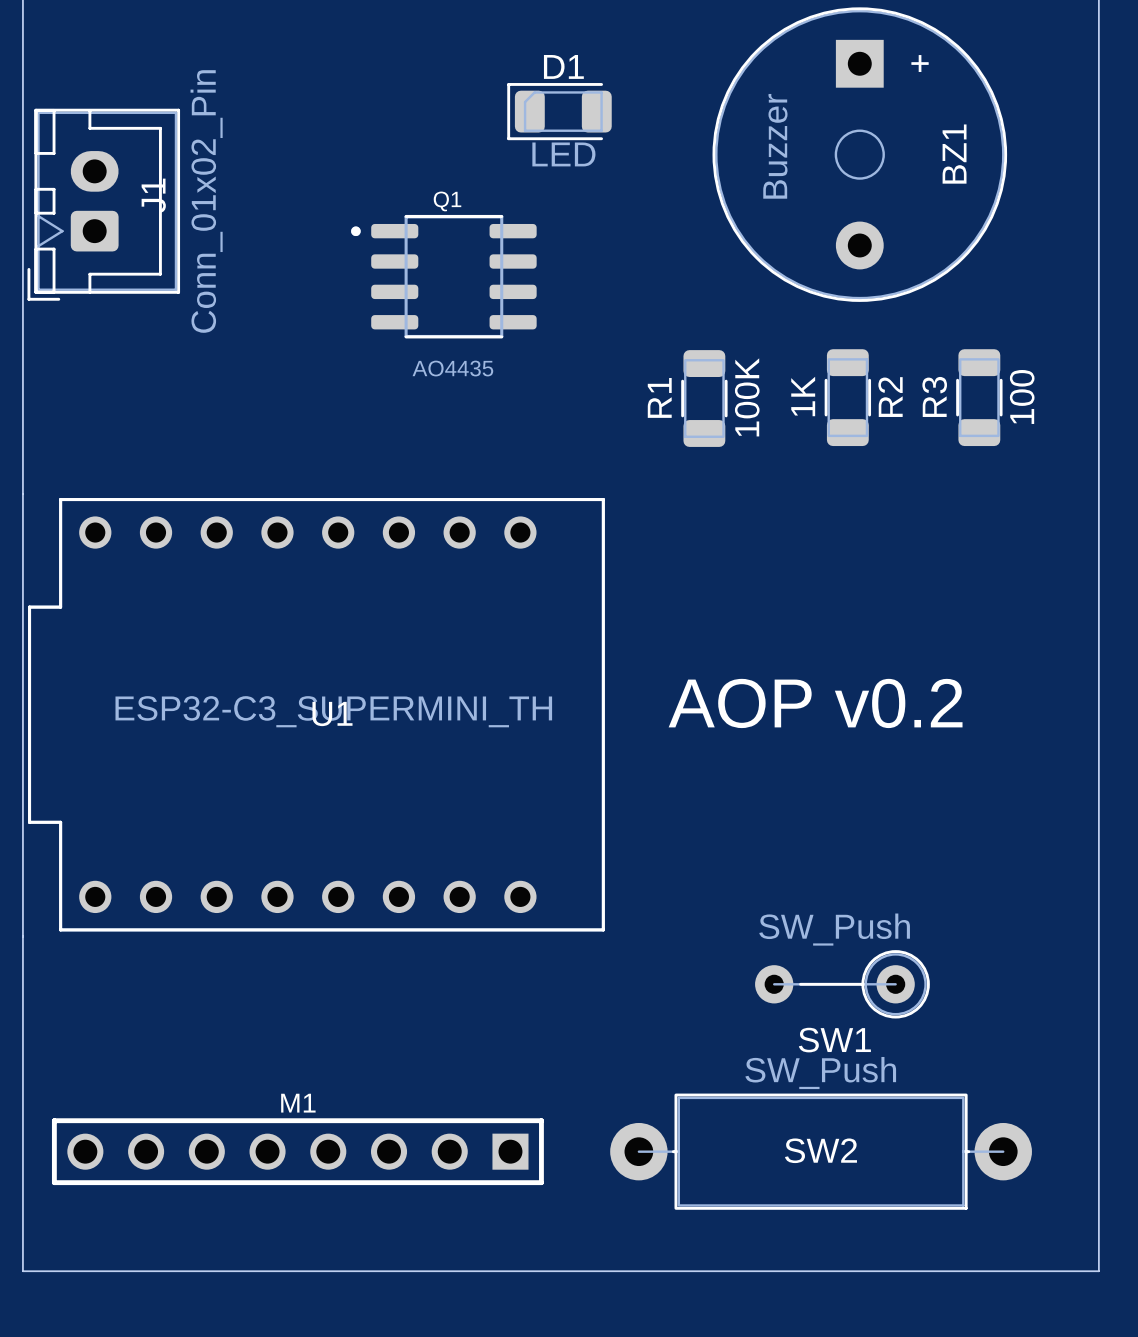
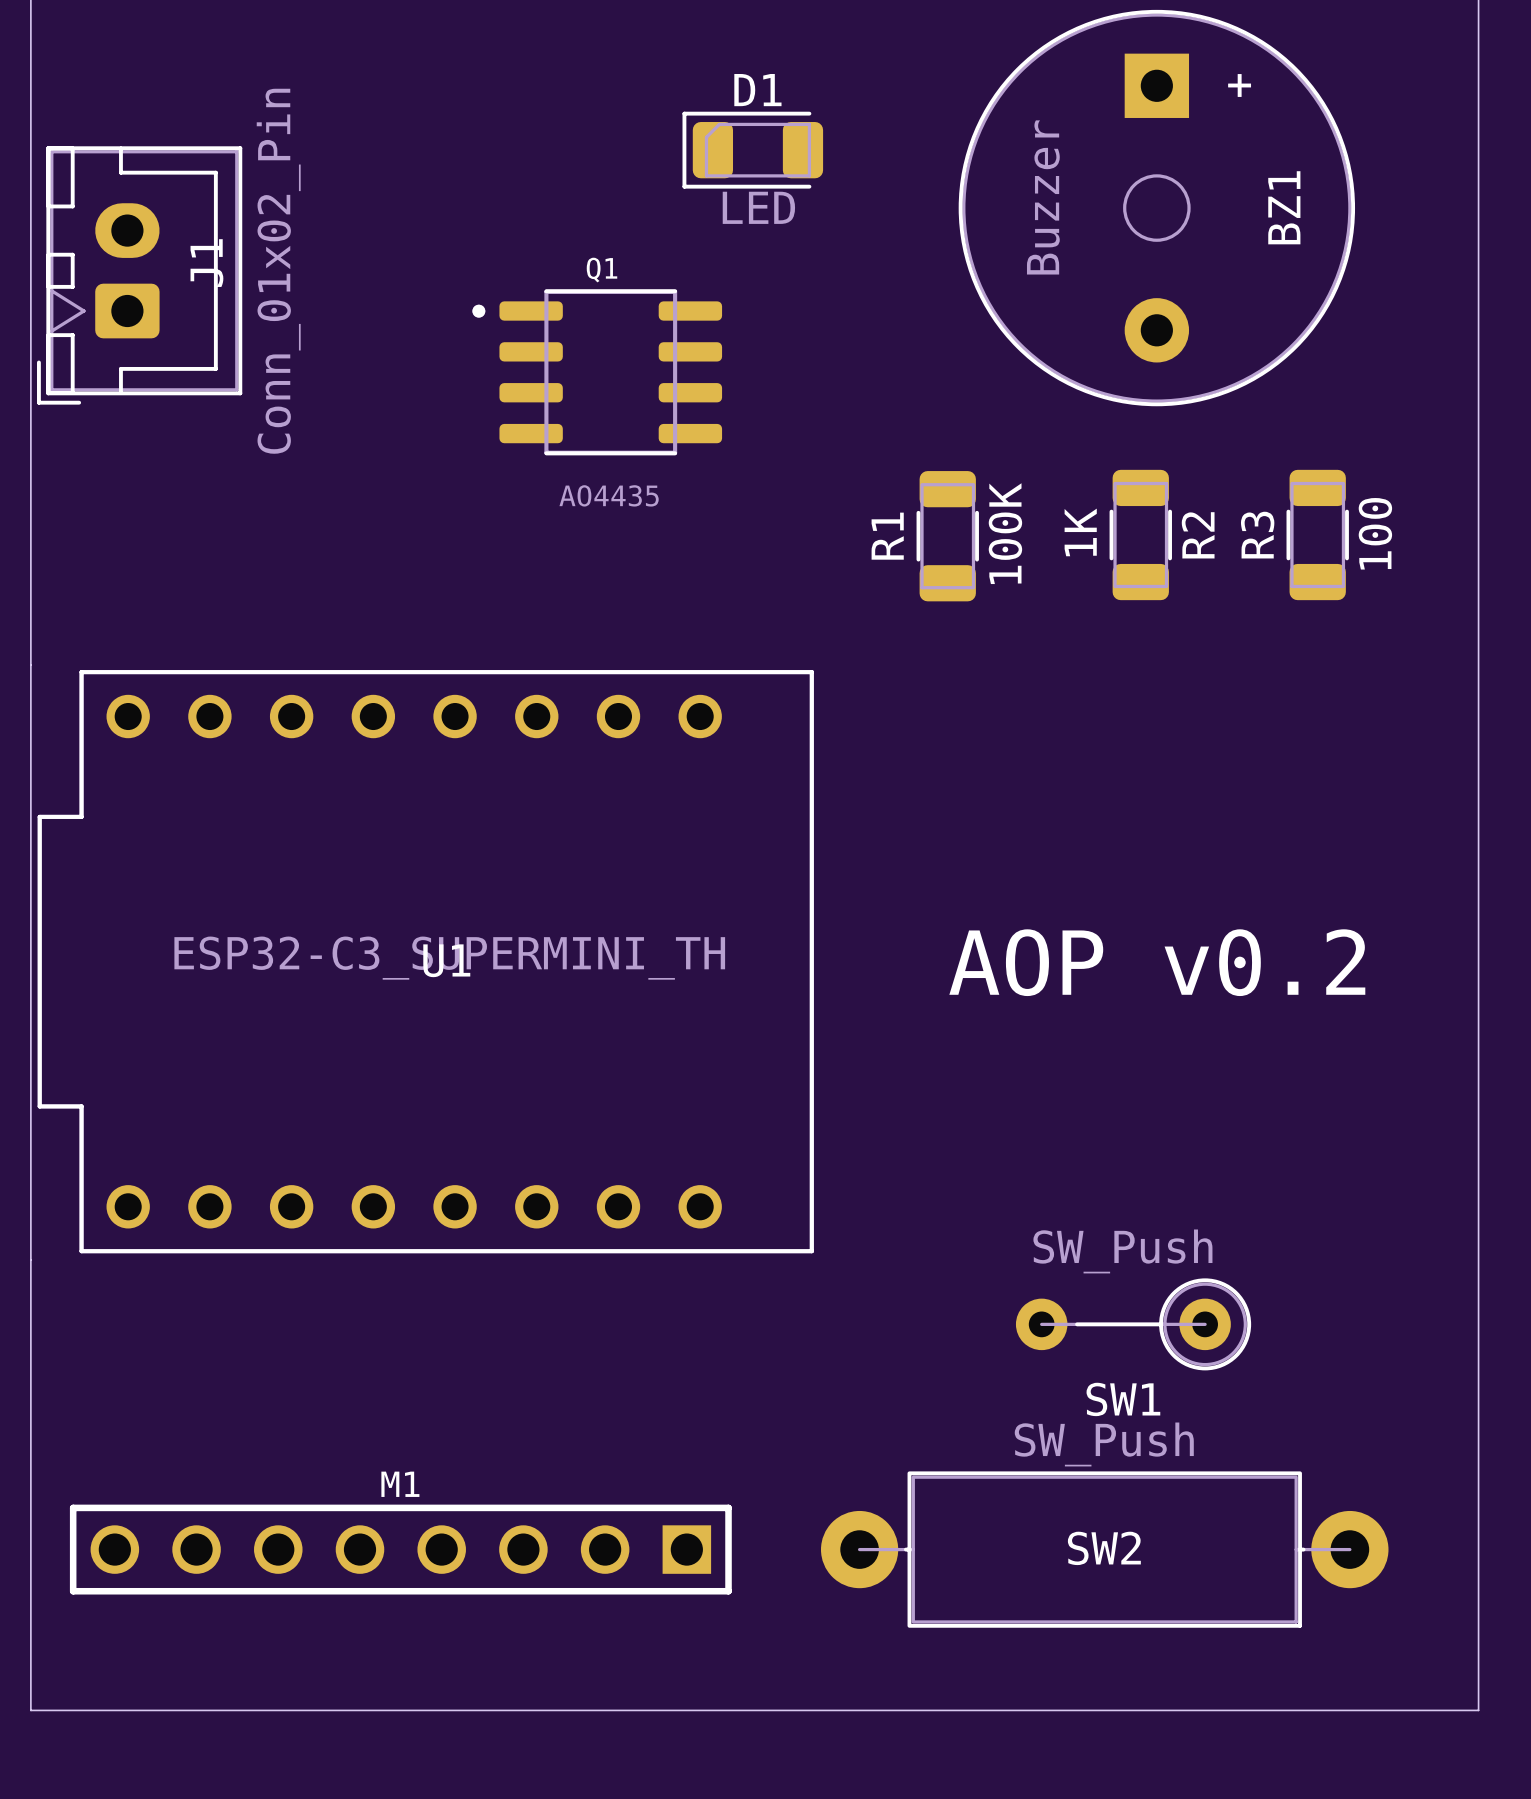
text position: AOP v0.2 (815, 703) -> AOP v0.2 (1157, 962)

